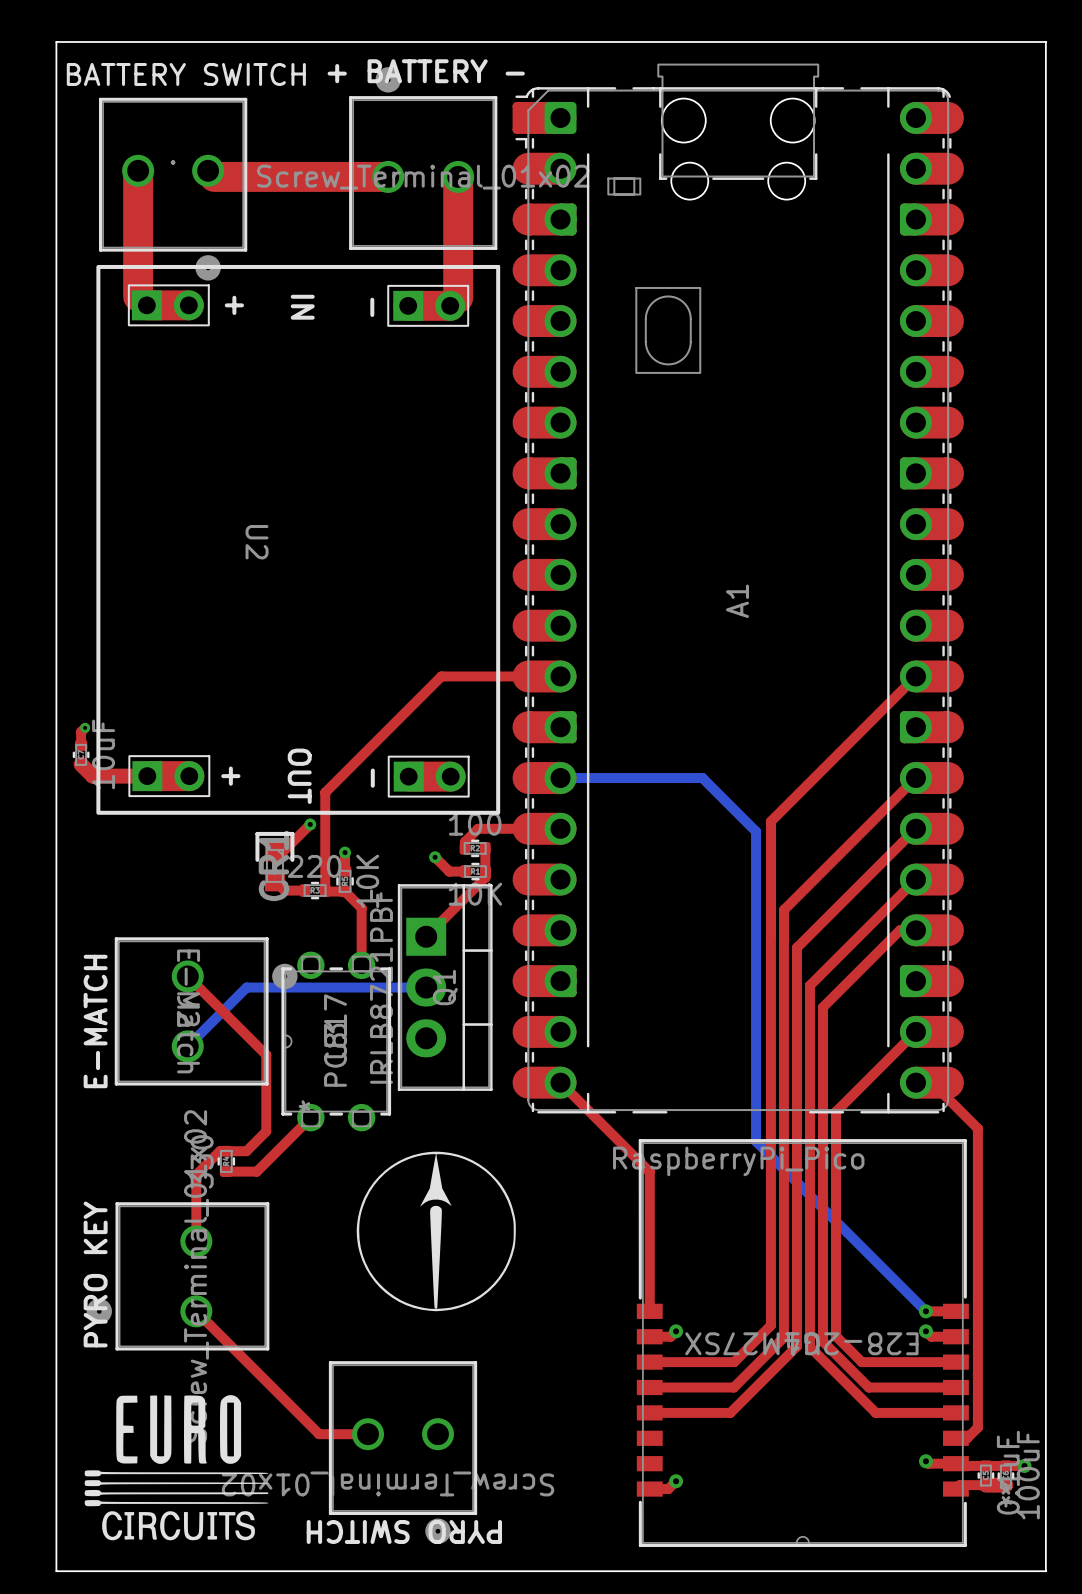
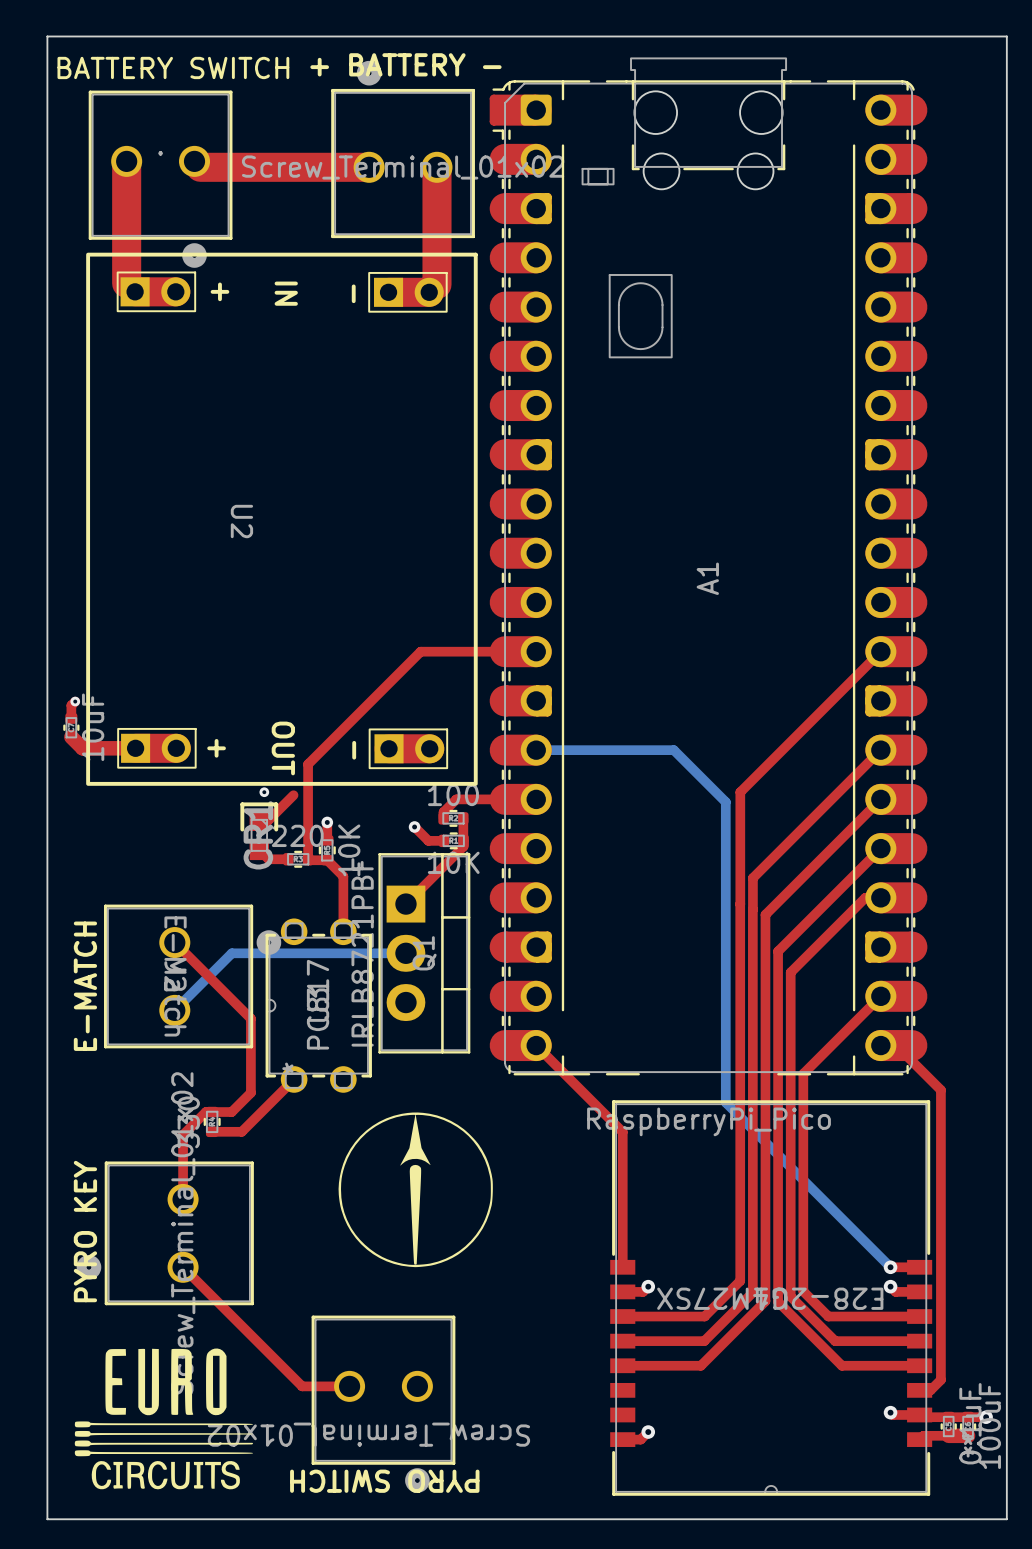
via: none -> (264, 792)
via: (310, 824) -> none

